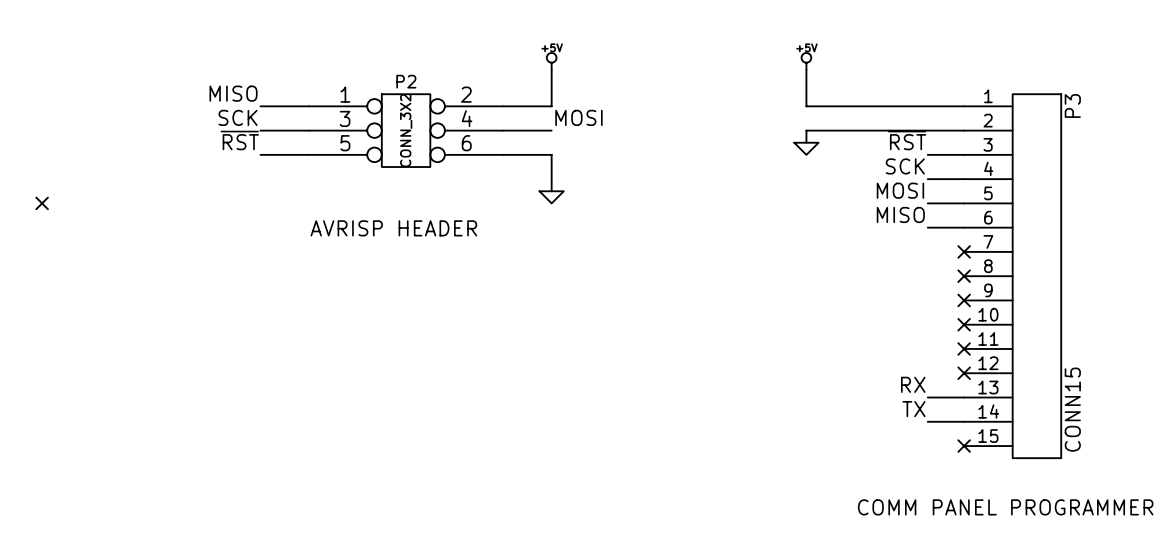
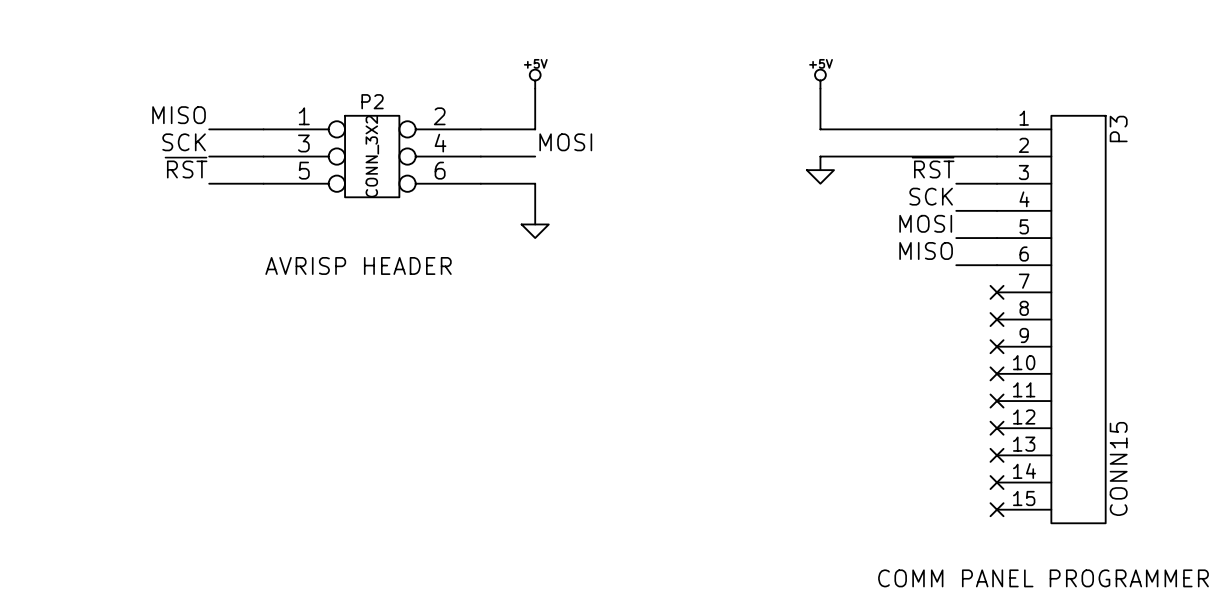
label: RX (913, 384) -> none
wire: (927, 397) (964, 397) -> none
no-connect mark: none -> (997, 455)
label: TX (913, 409) -> none
wire: (927, 421) (964, 421) -> none
no-connect mark: none -> (997, 482)

